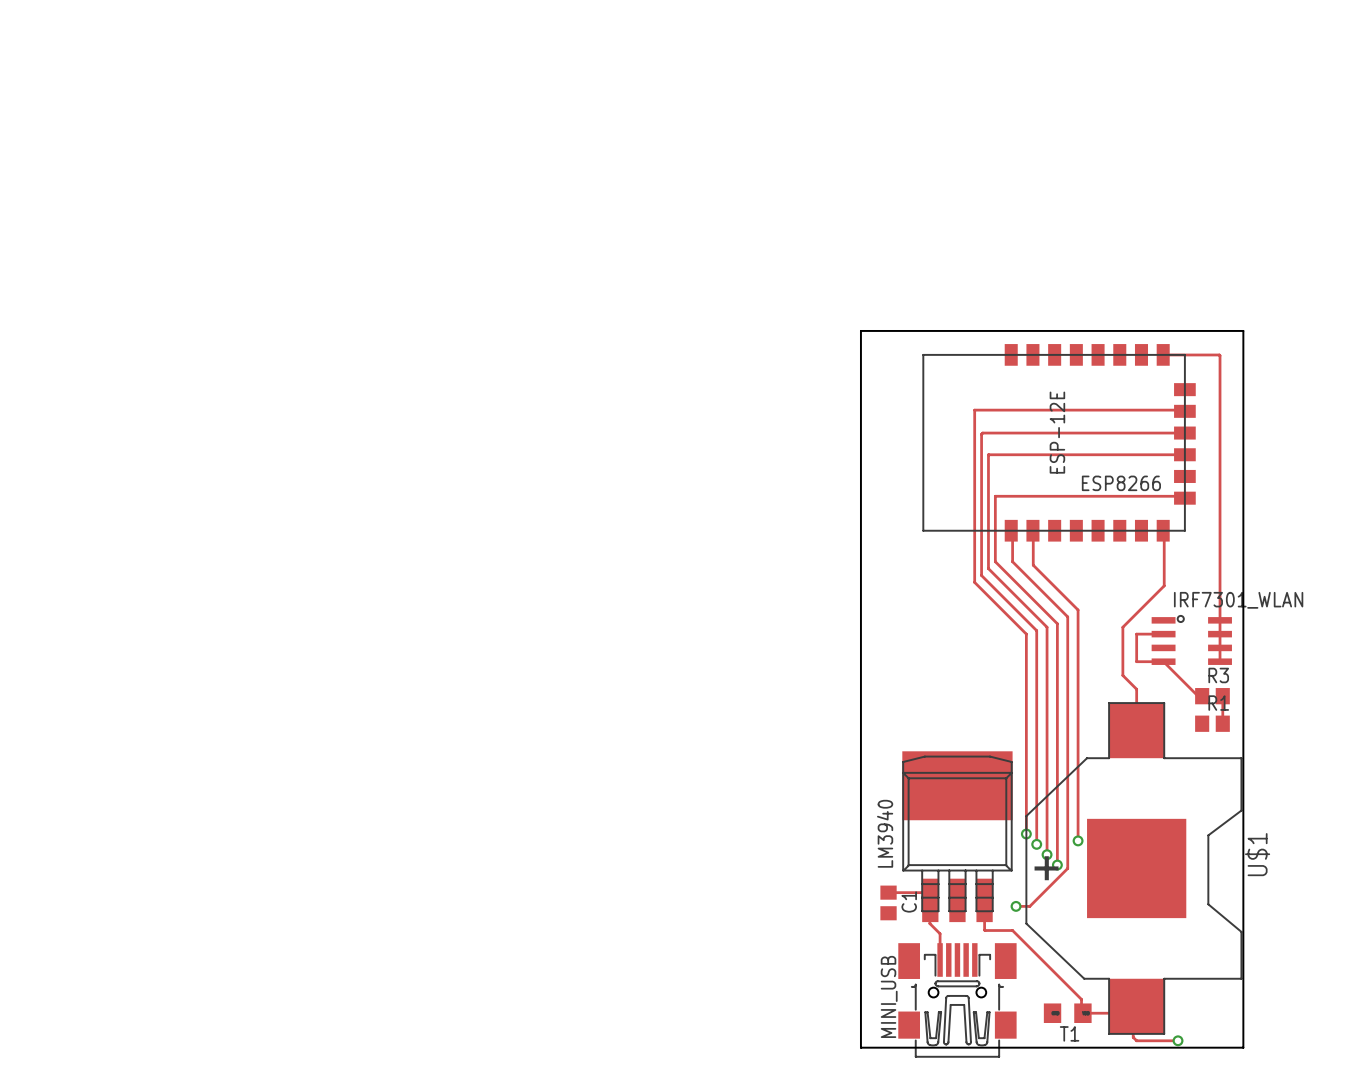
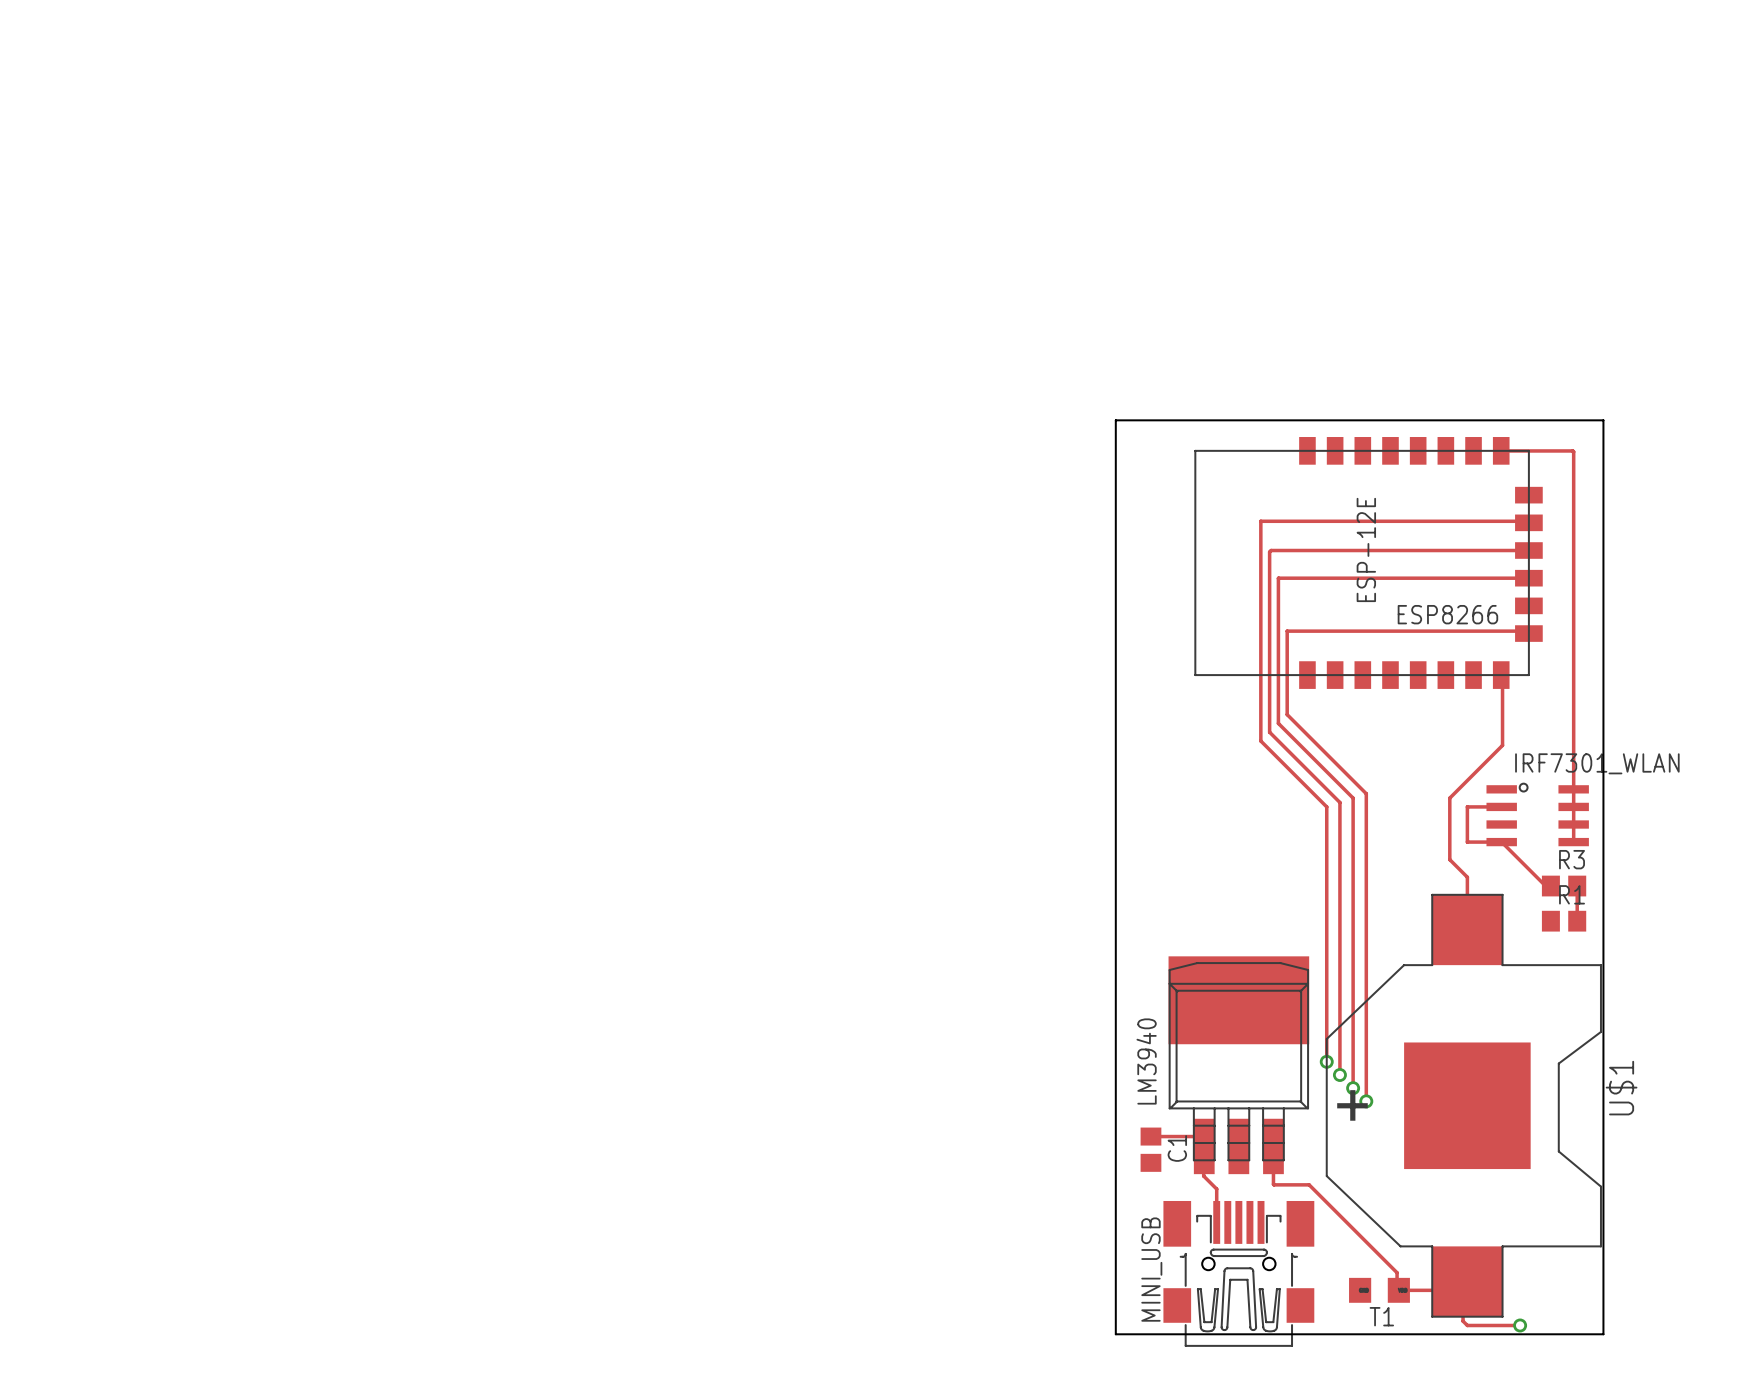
track: (1011, 530) (1012, 561) (1067, 616) (1067, 868) (1029, 906) (1016, 906) -> none
track: (1032, 530) (1033, 565) (1078, 610) (1078, 840) -> none
via: (1078, 840) -> none
via: (1016, 906) -> none

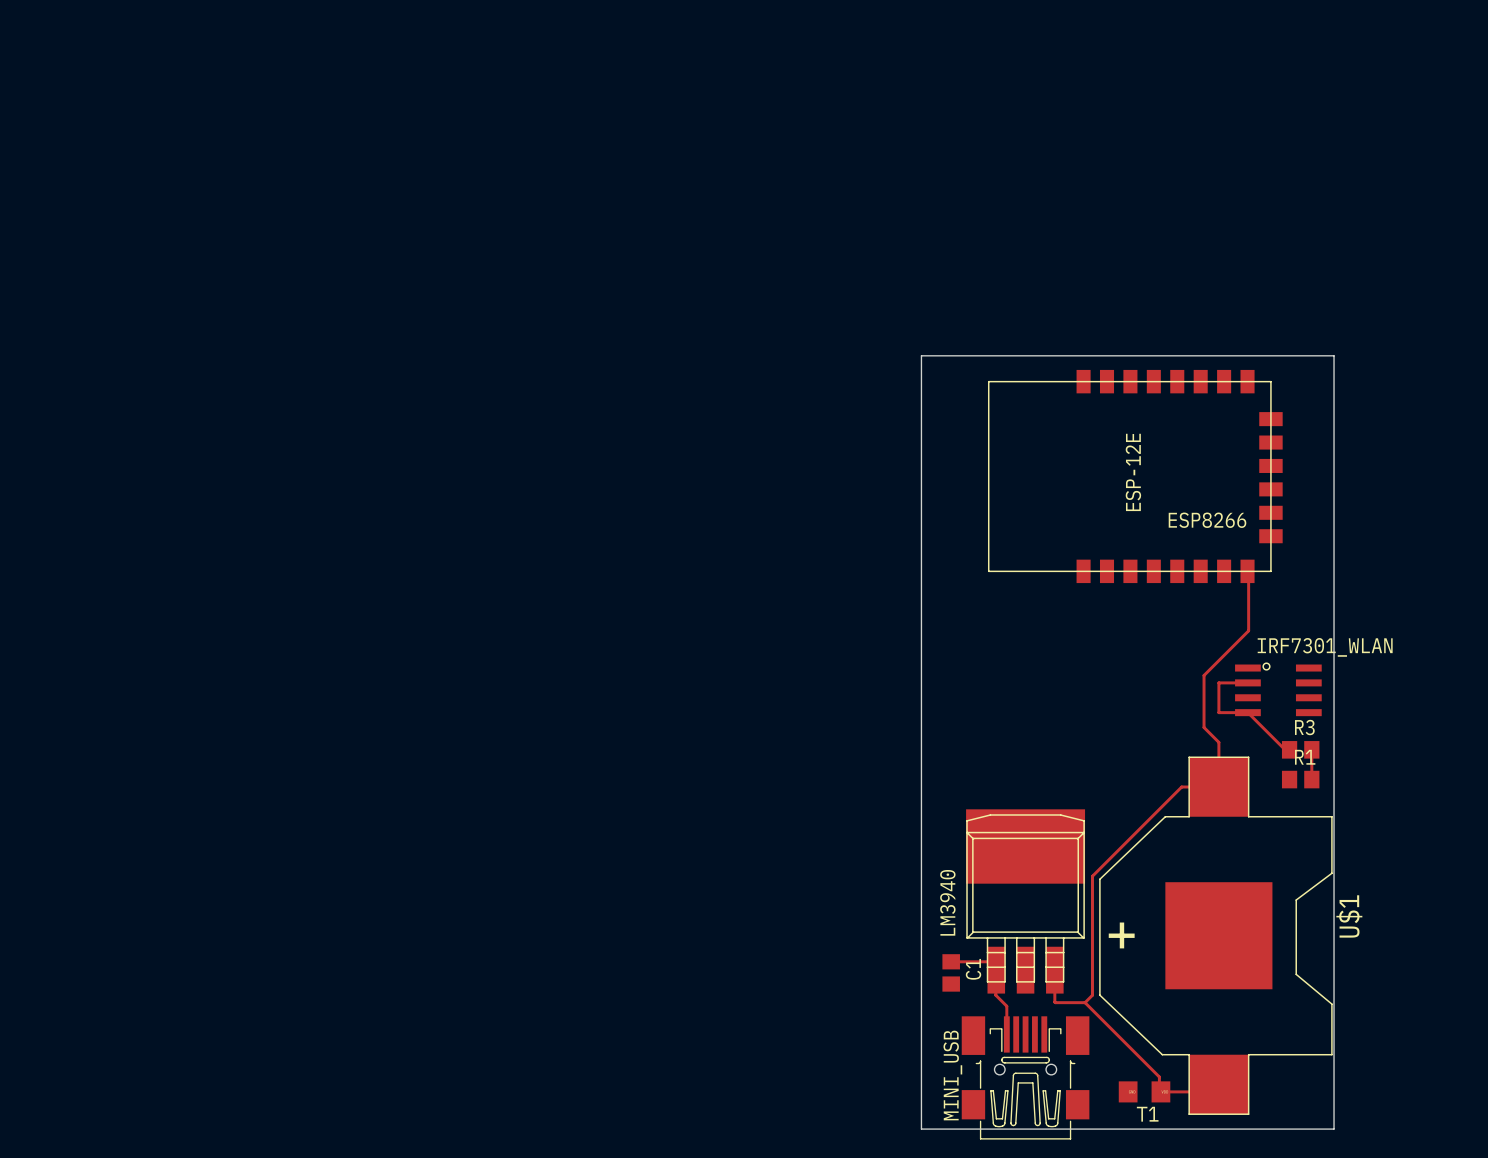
track: (1501, 450) (1573, 451) (1573, 842) -> none
track: (1528, 522) (1527, 521) (1260, 521) (1260, 741) (1326, 806) (1326, 1061) -> none
track: (1528, 550) (1271, 550) (1269, 552) (1269, 732) (1339, 802) (1339, 1075) -> none
track: (1528, 578) (1278, 578) (1278, 723) (1353, 798) (1353, 1088) -> none
track: (1528, 633) (1526, 631) (1287, 631) (1287, 714) (1366, 793) (1366, 1101) -> none
track: none -> (1218, 787) (1181, 787) (1092, 876) (1092, 995) (1085, 1002)
via: (1326, 1061) -> none
via: (1339, 1075) -> none
via: (1353, 1088) -> none
via: (1366, 1101) -> none
track: (1467, 1281) (1467, 1303) (1463, 1307) (1463, 1321) (1467, 1325) (1520, 1325) -> none
via: (1520, 1325) -> none

